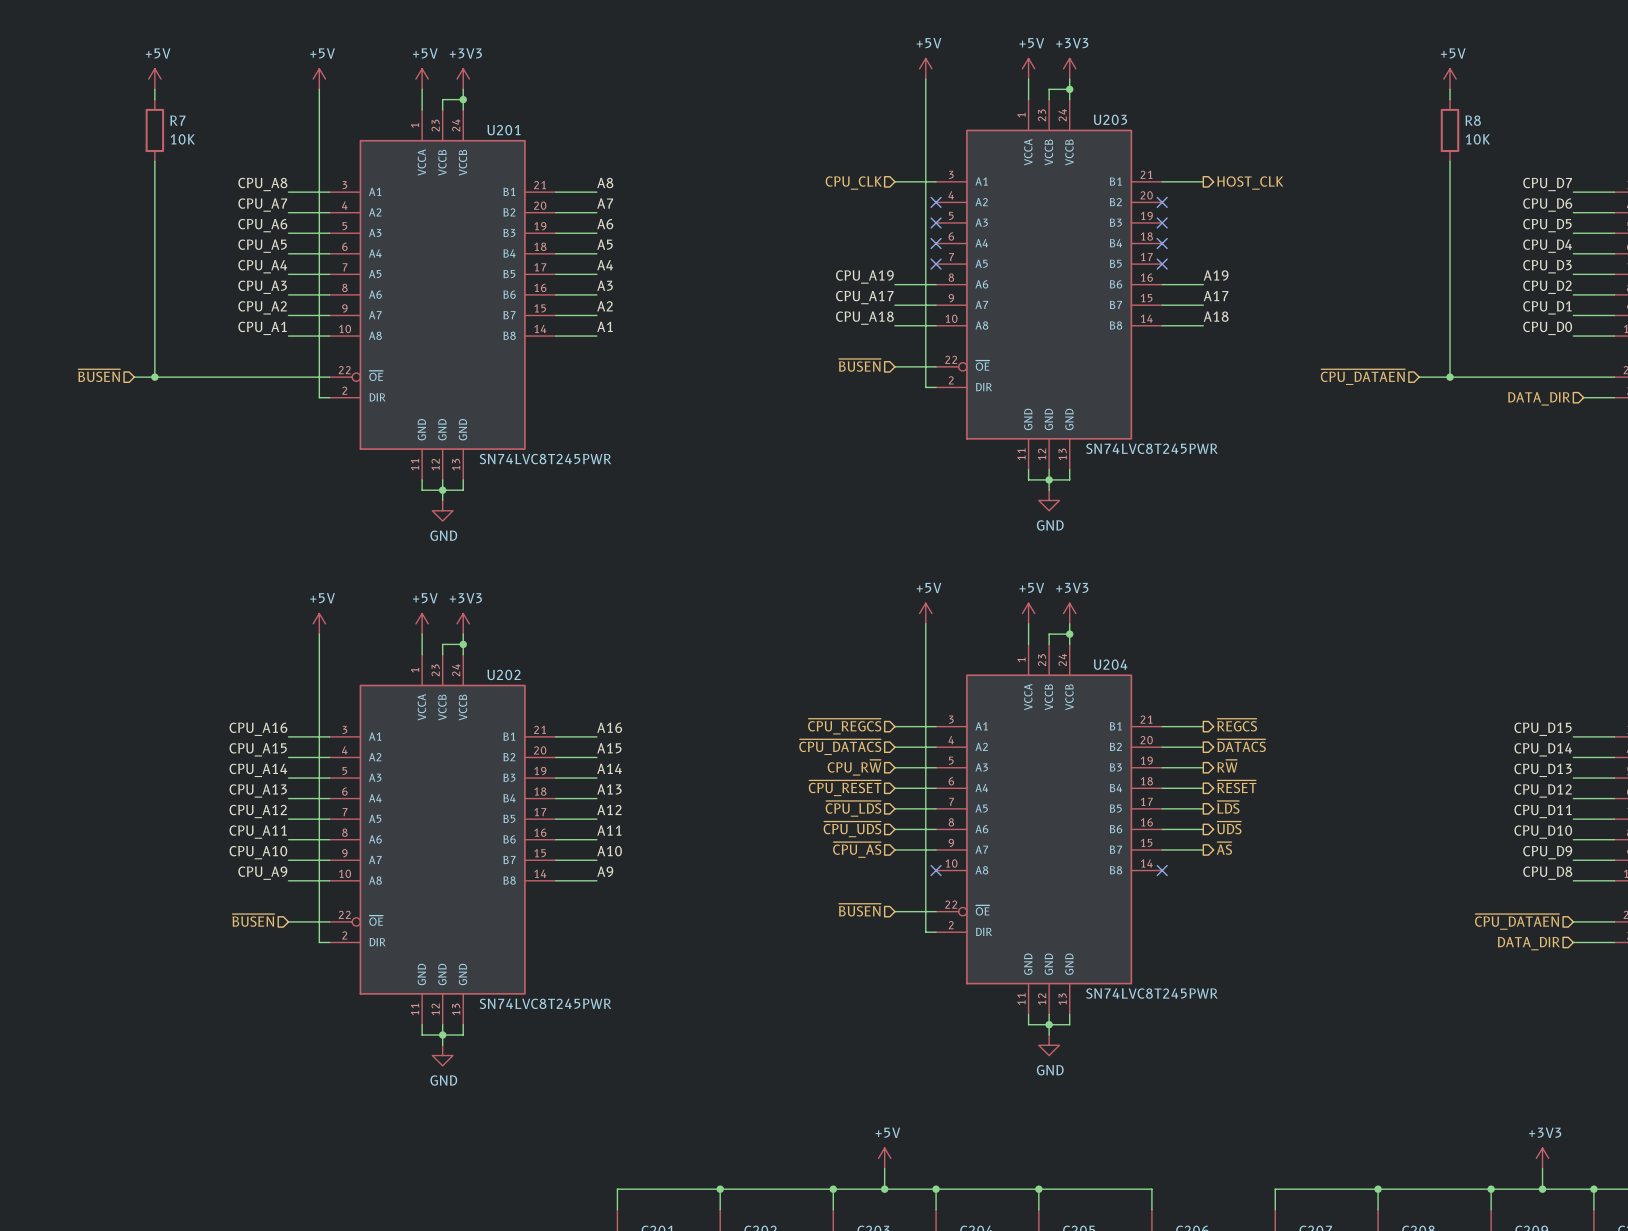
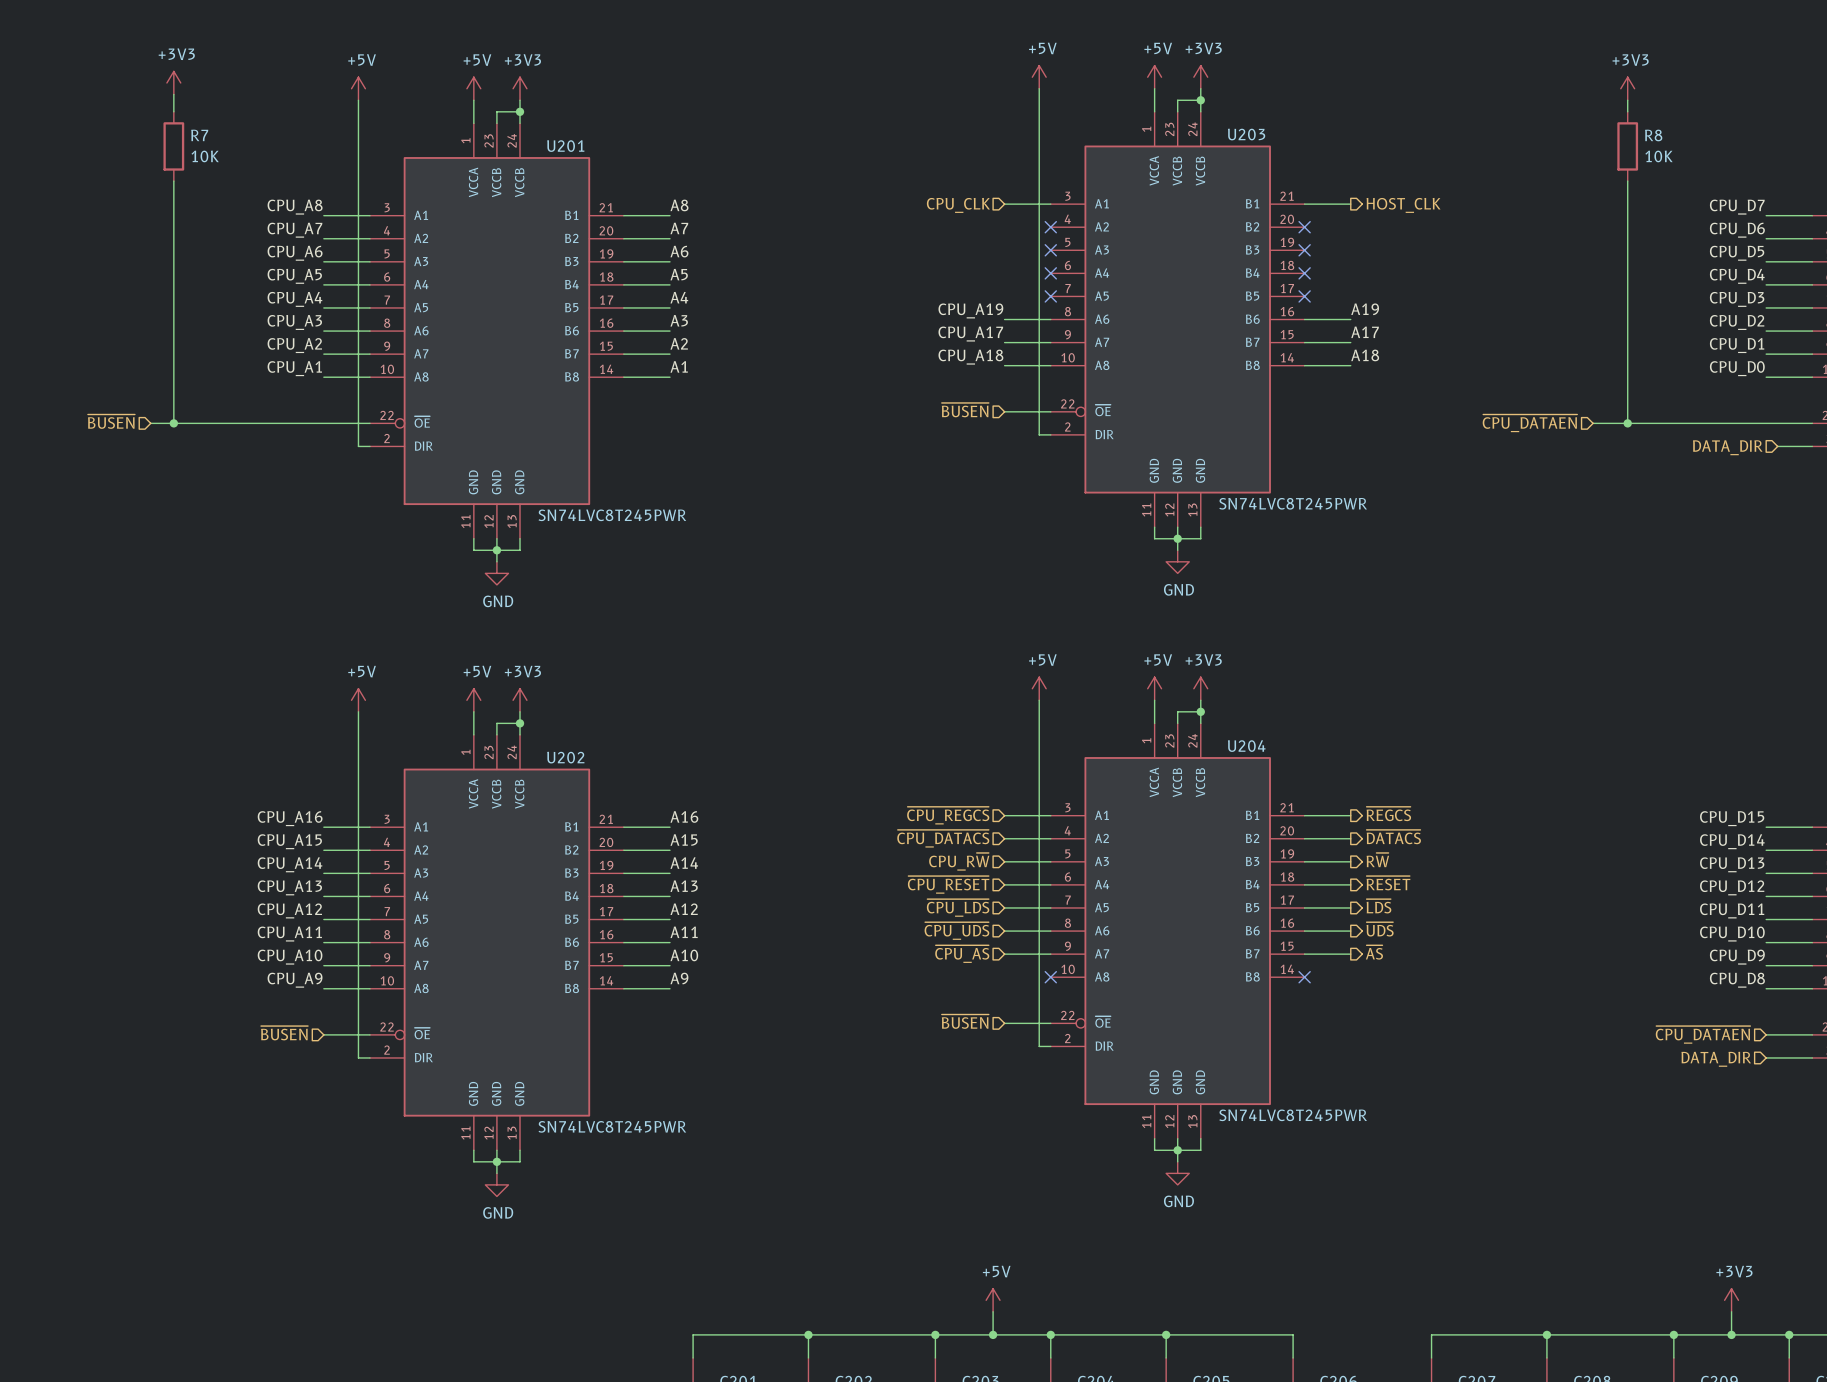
power symbol: +5V (154, 79) -> +3V3 (173, 82)
power symbol: +5V (1450, 79) -> +3V3 (1627, 88)

